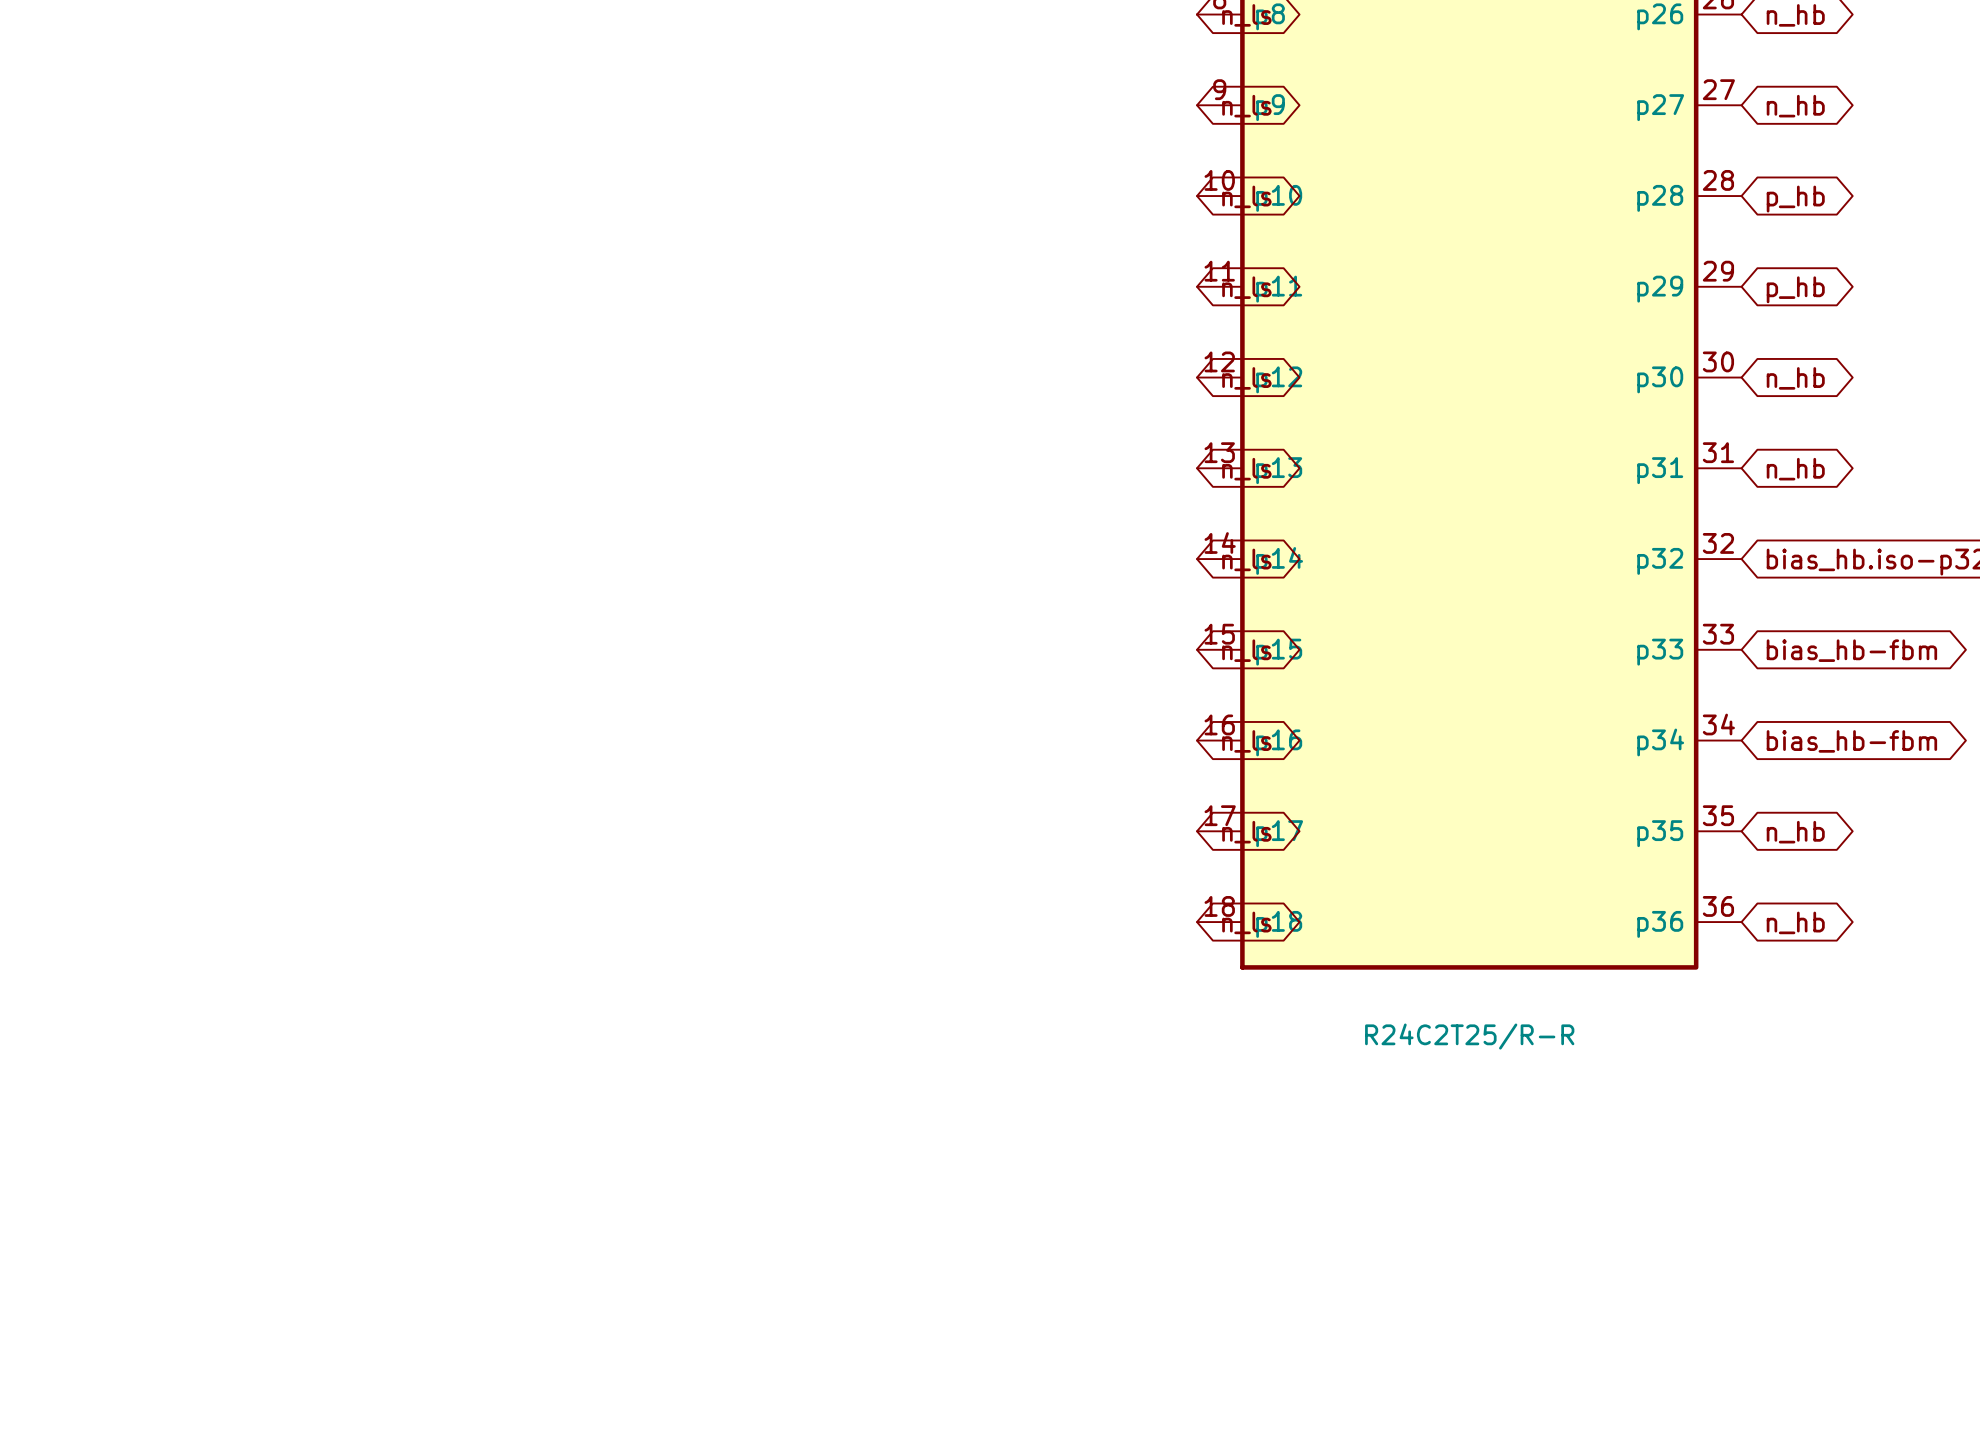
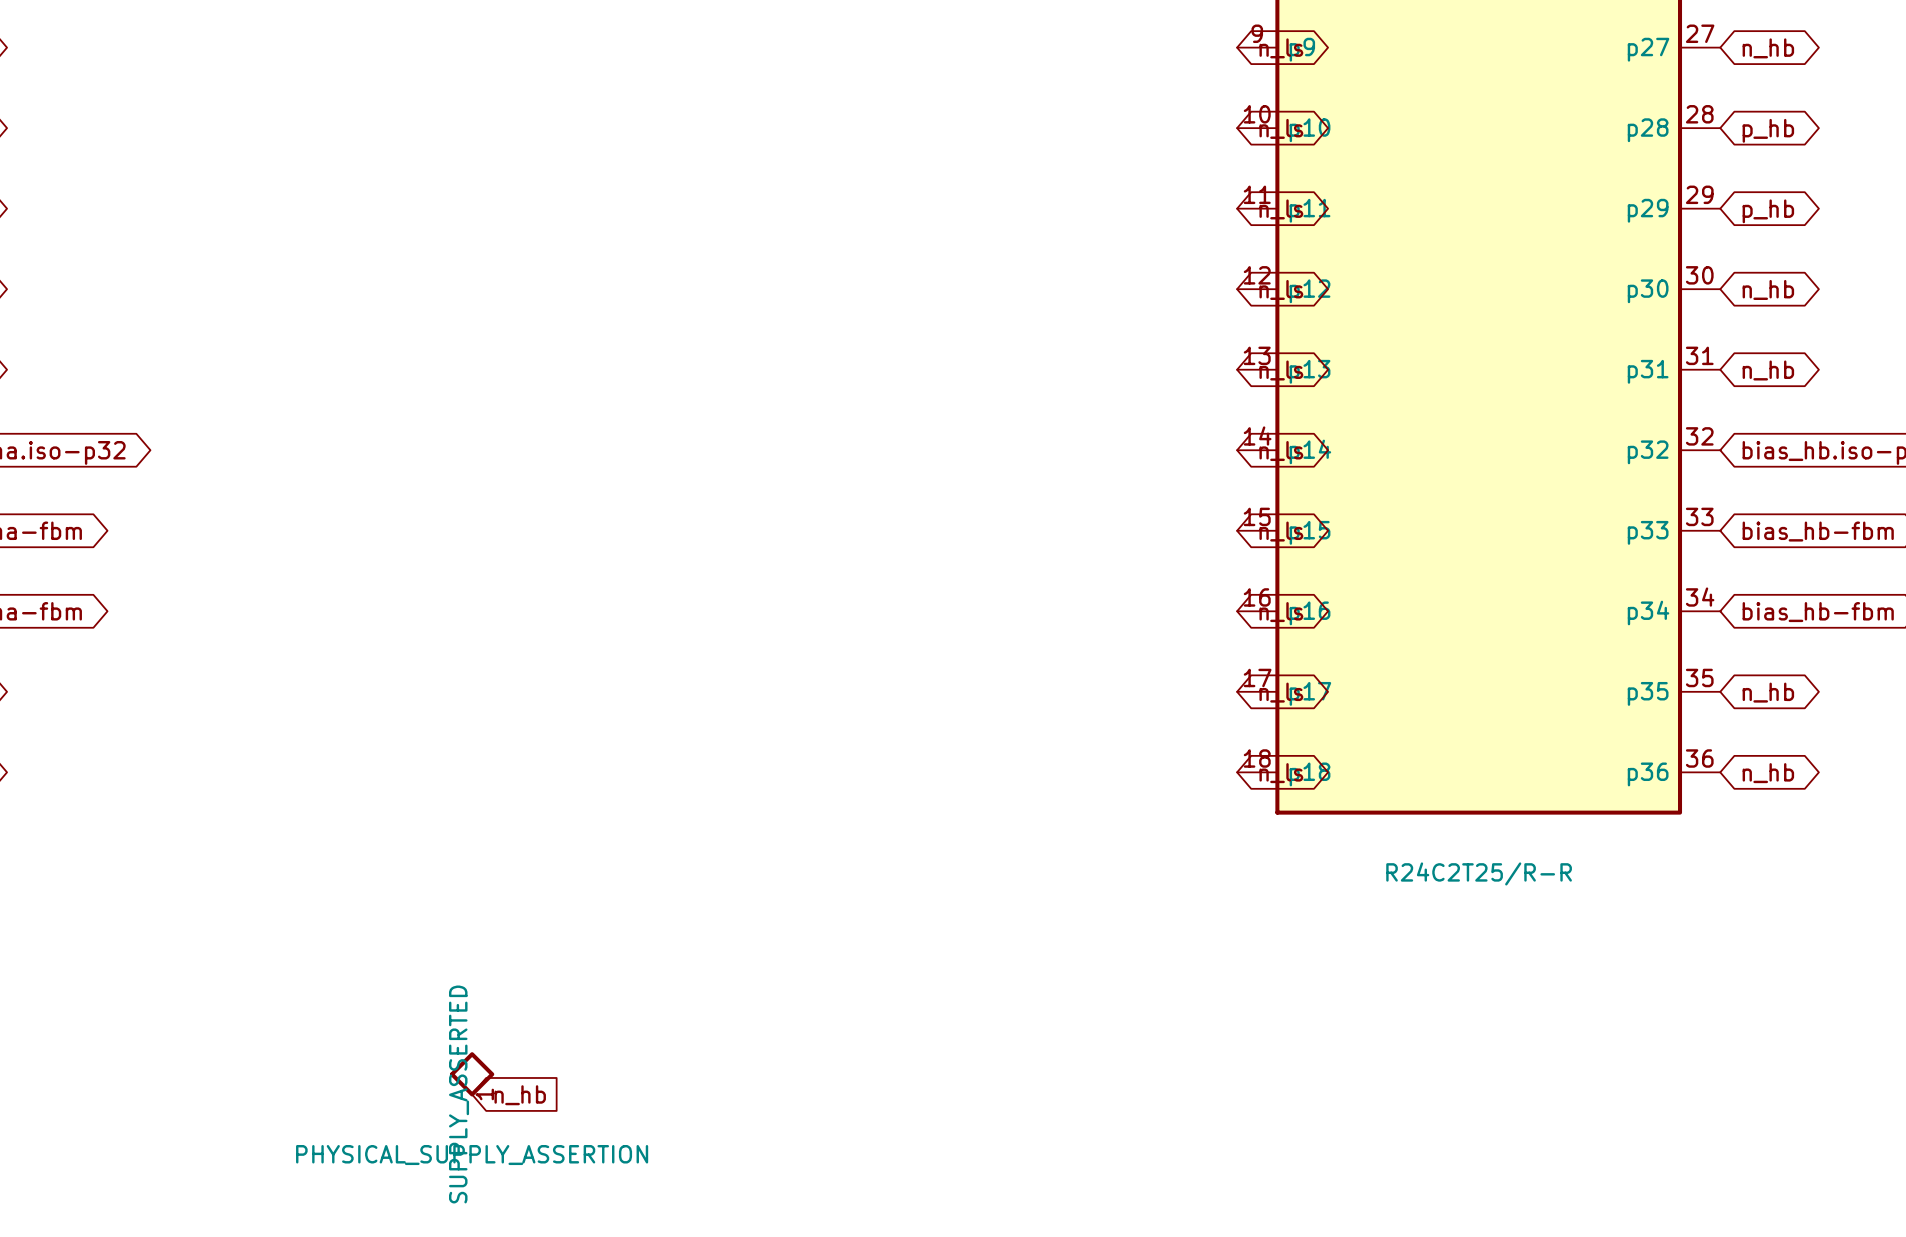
power symbol: none -> PHYSICAL_SUPPLY_ASSERTION (472, 1074)
global label: none -> n_hb (520, 1095)

